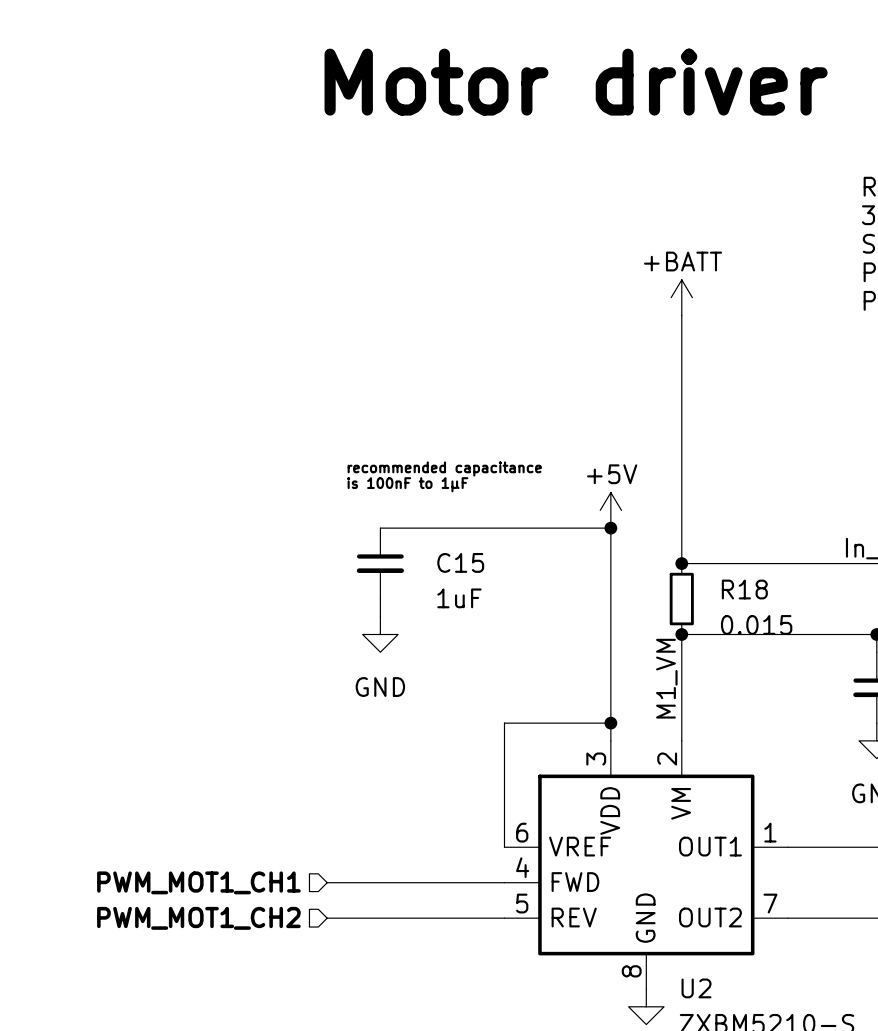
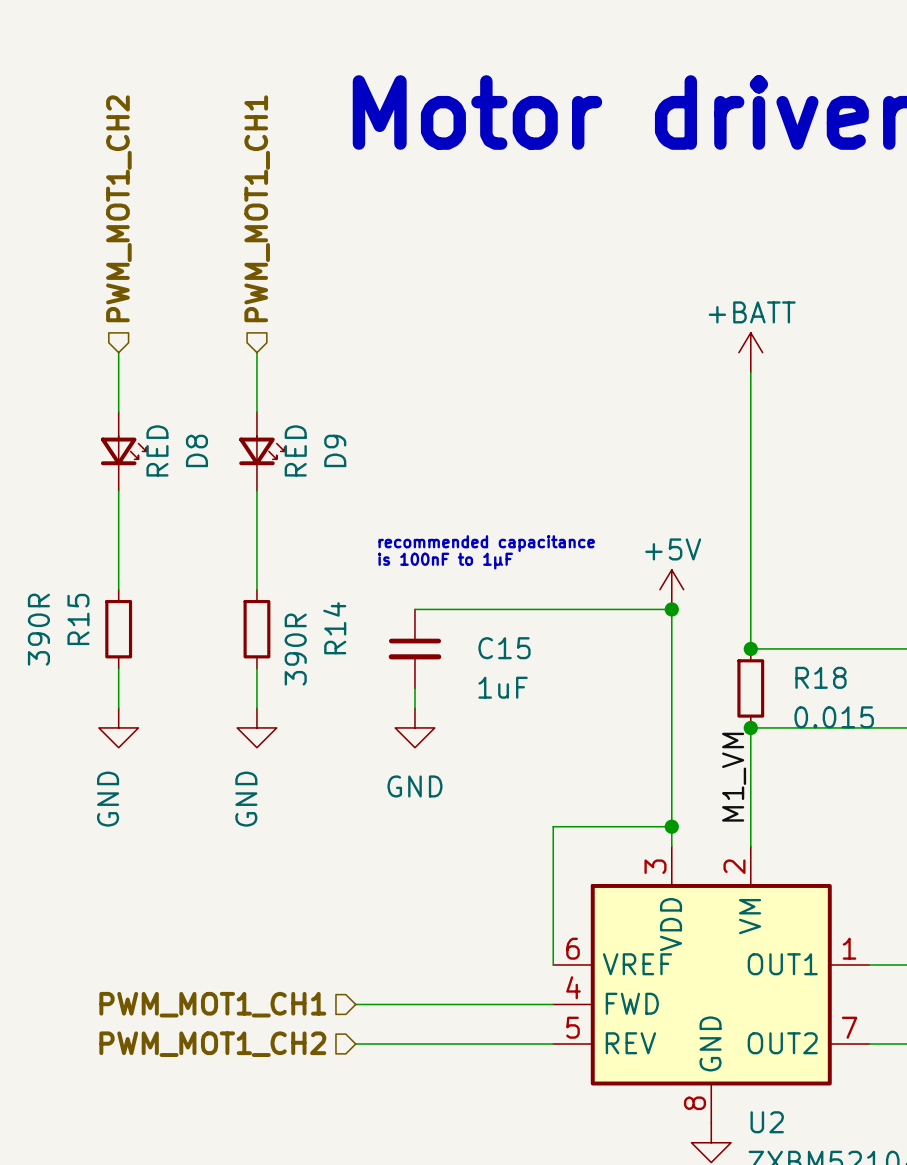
hierarchical label: none -> PWM_MOT1_CH2 (118, 208)
hierarchical label: none -> PWM_MOT1_CH1 (257, 208)
wire: none -> (118, 352) (118, 411)
wire: none -> (256, 352) (256, 411)
D8: none -> RED (123, 451)
D9: none -> RED (261, 451)
wire: none -> (118, 490) (118, 589)
wire: none -> (256, 490) (256, 589)
R14: none -> 390R (118, 629)
R15: none -> 390R (256, 629)
wire: none -> (118, 668) (118, 708)
wire: none -> (256, 668) (256, 708)
power symbol: none -> GND (118, 727)
power symbol: none -> GND (256, 727)

